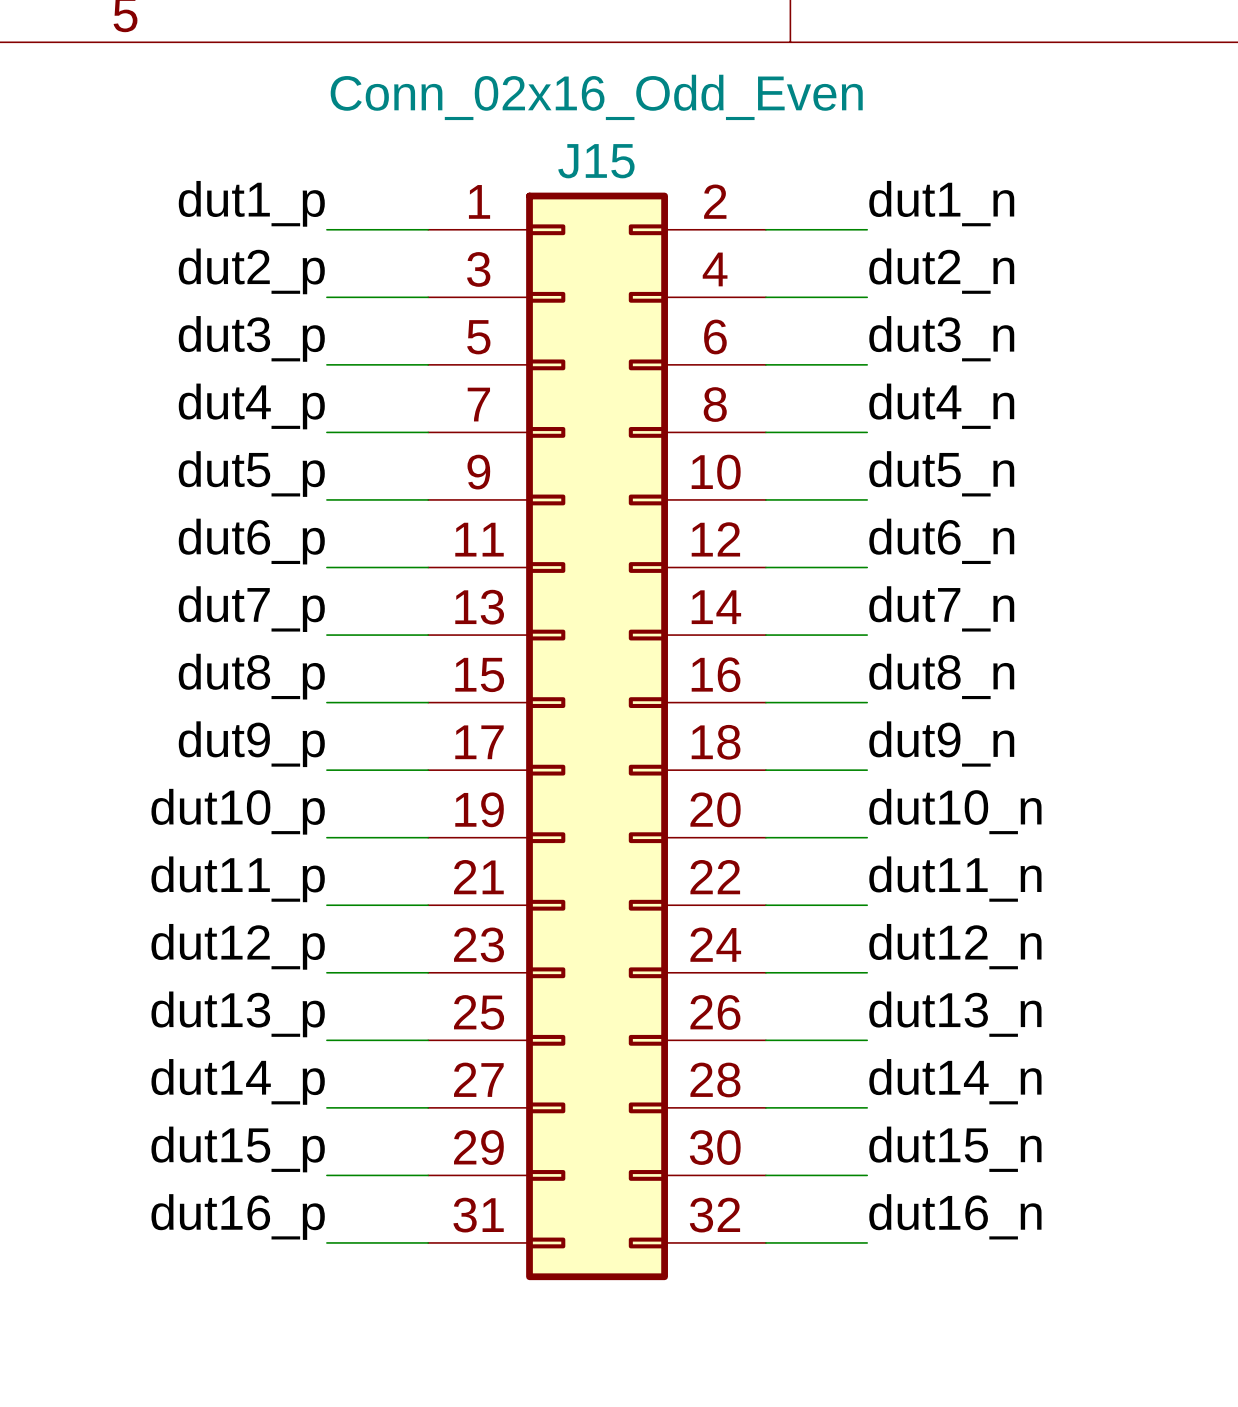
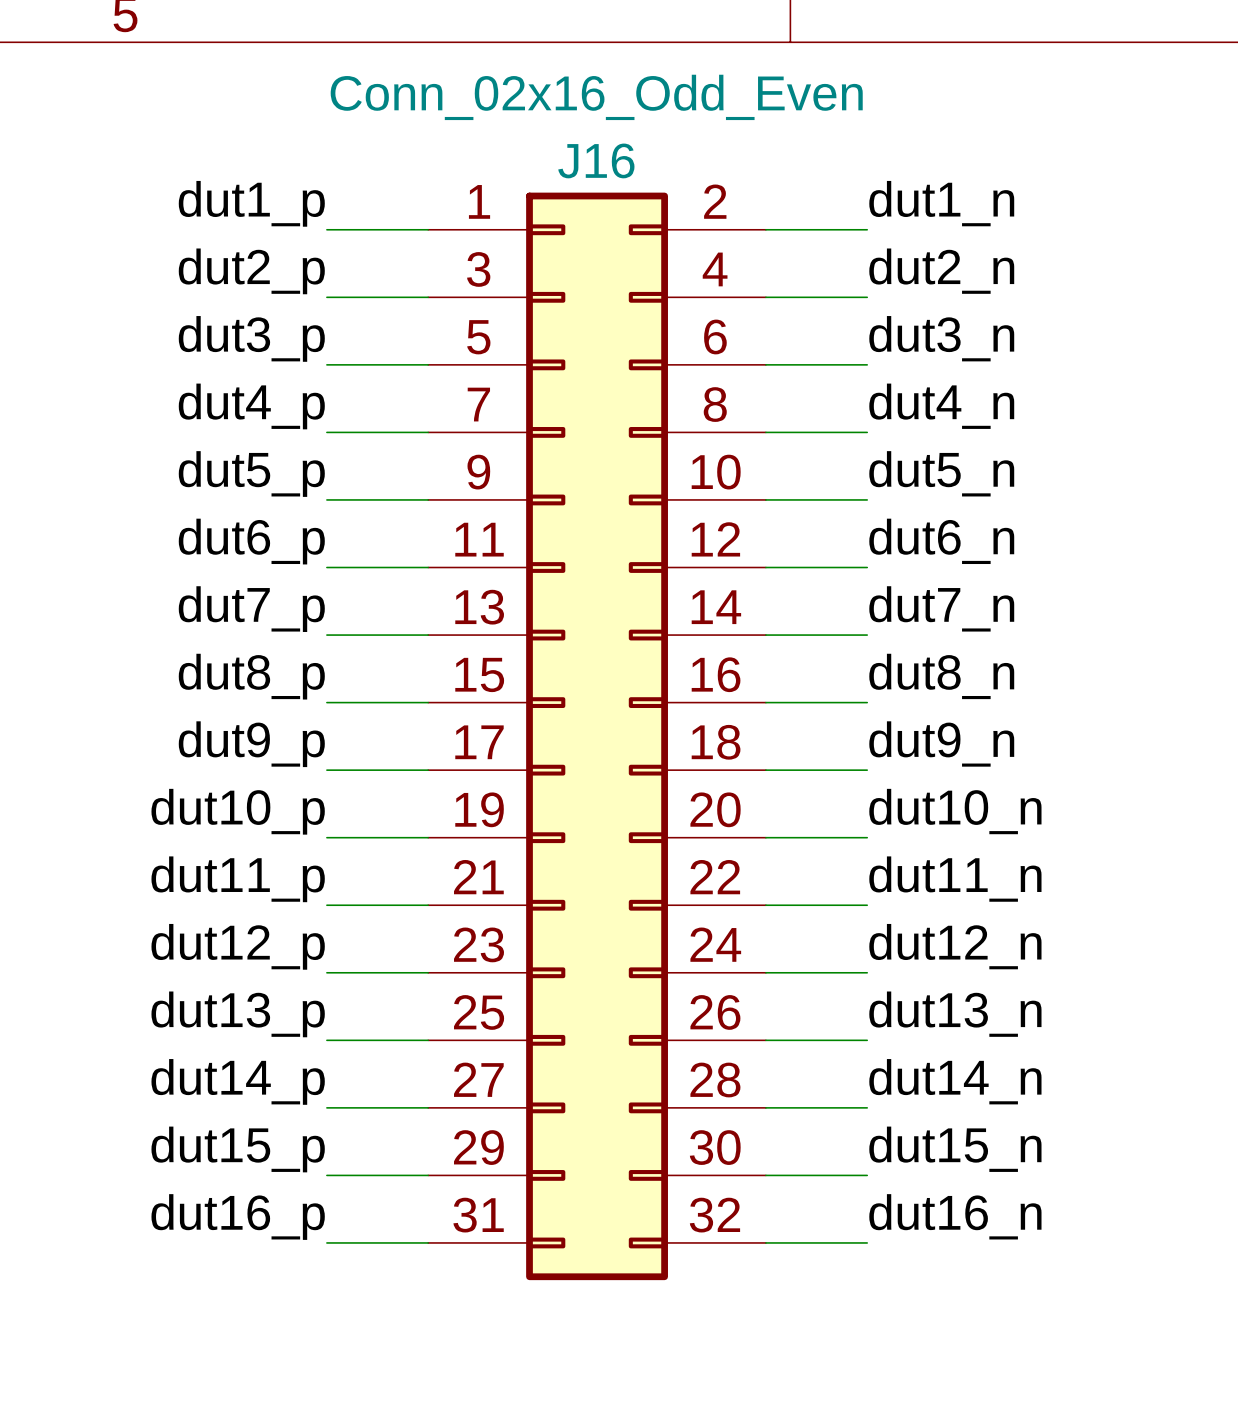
J15 name: J15 (596, 161) -> J16 (596, 160)

